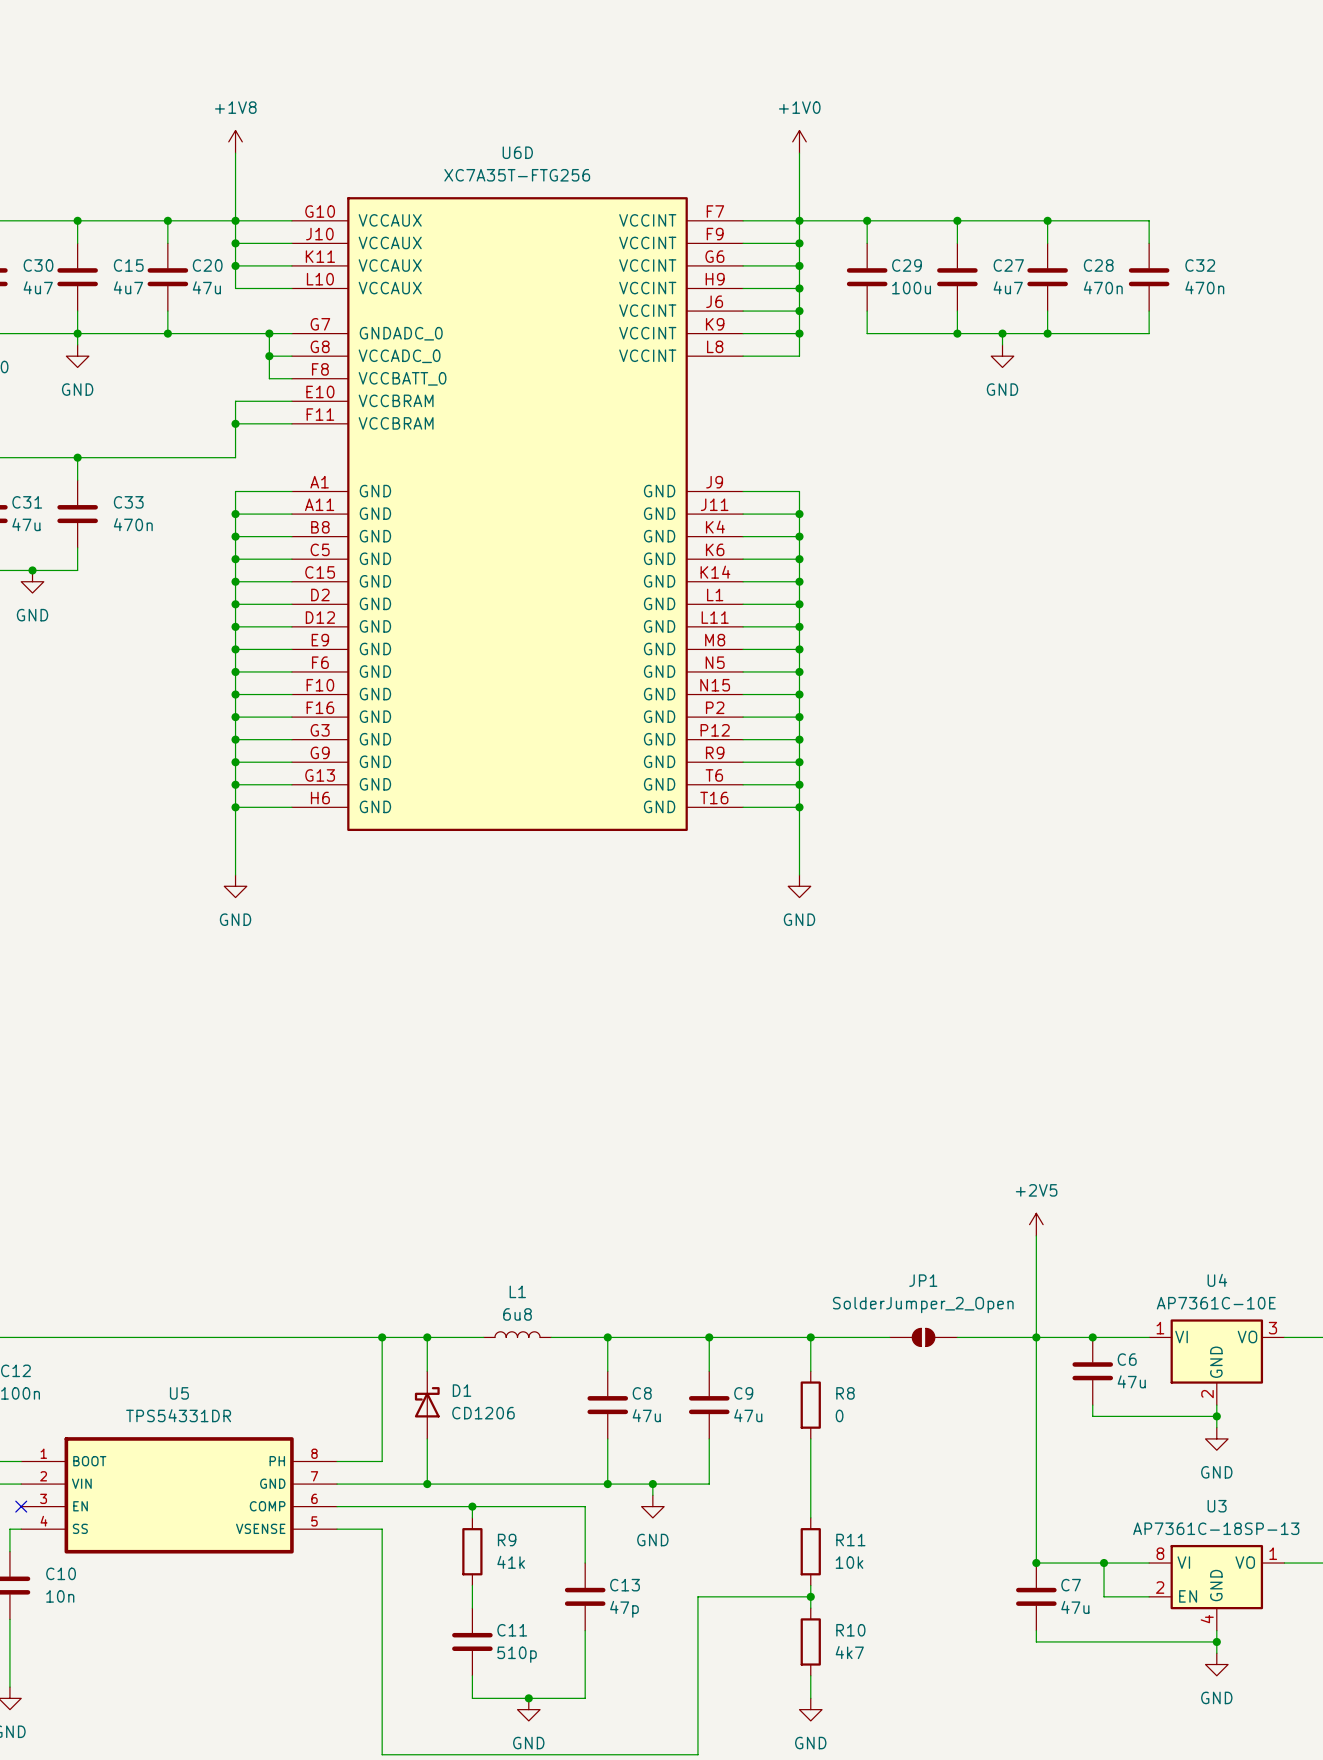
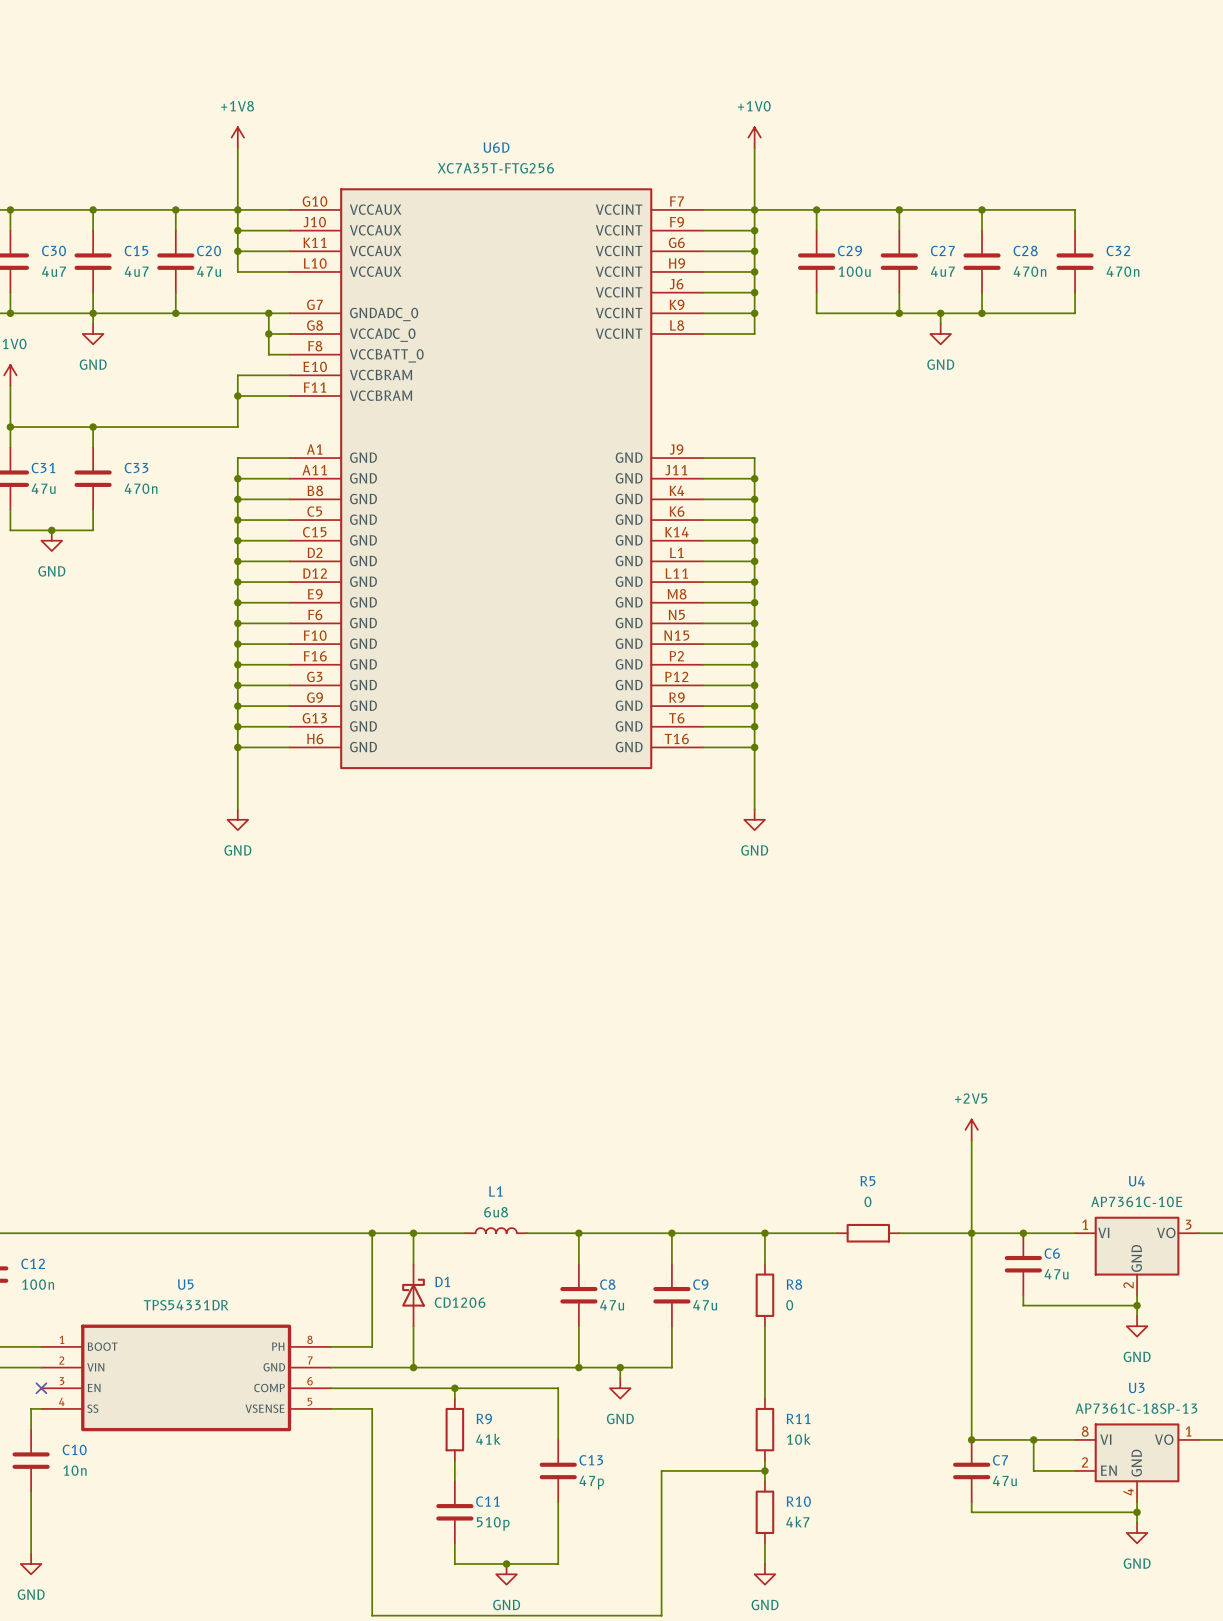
JP1: SolderJumper_2_Open (923, 1337) -> none
R5: none -> 0 (868, 1233)

